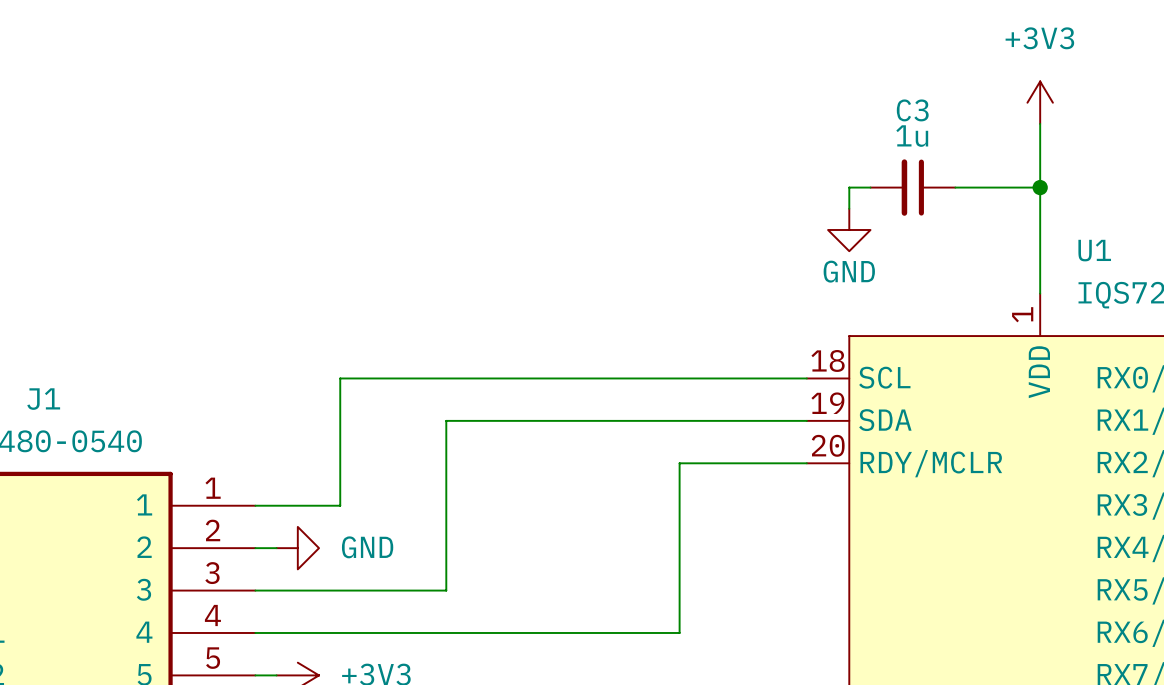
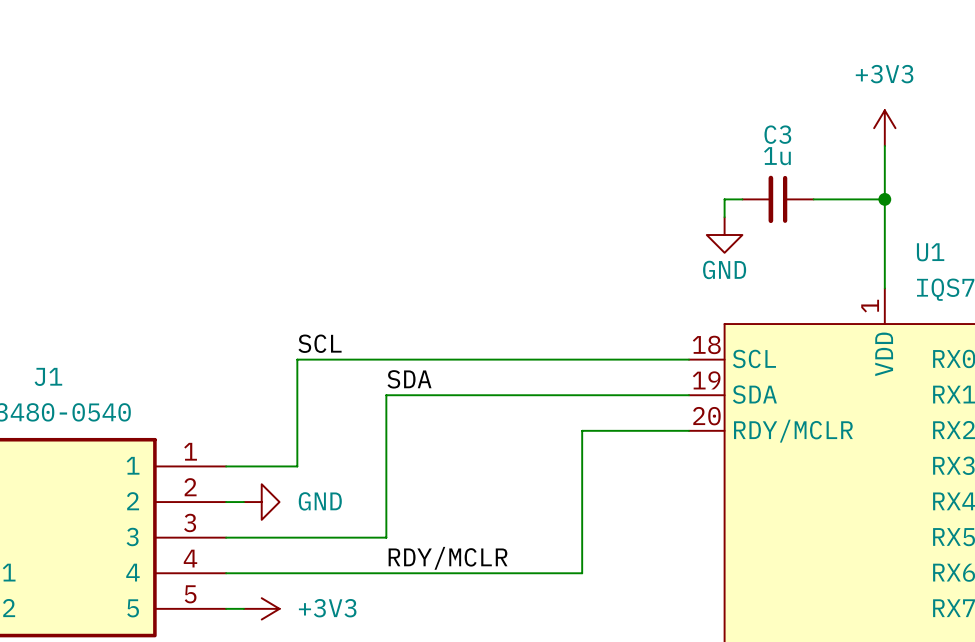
label: none -> SCL (320, 343)
label: none -> SDA (409, 379)
label: none -> RDY/MCLR (448, 558)

